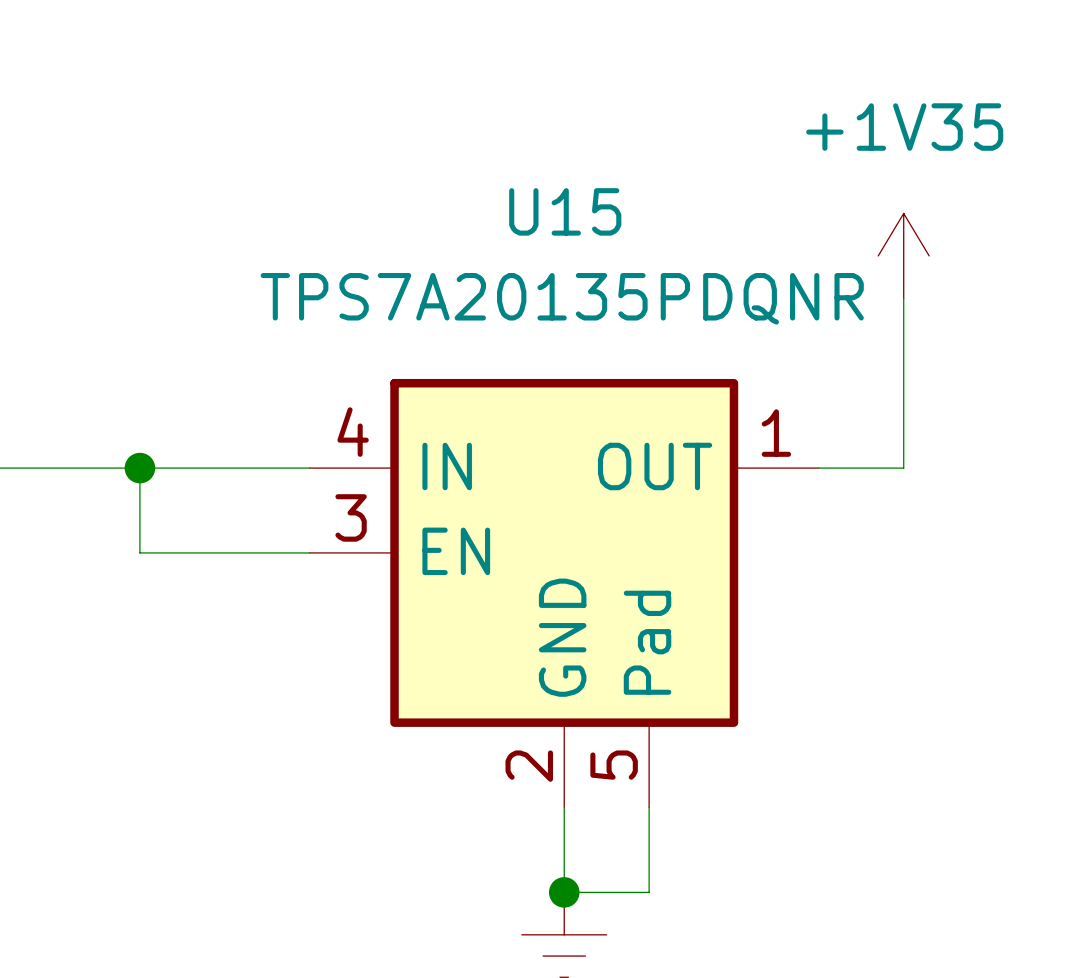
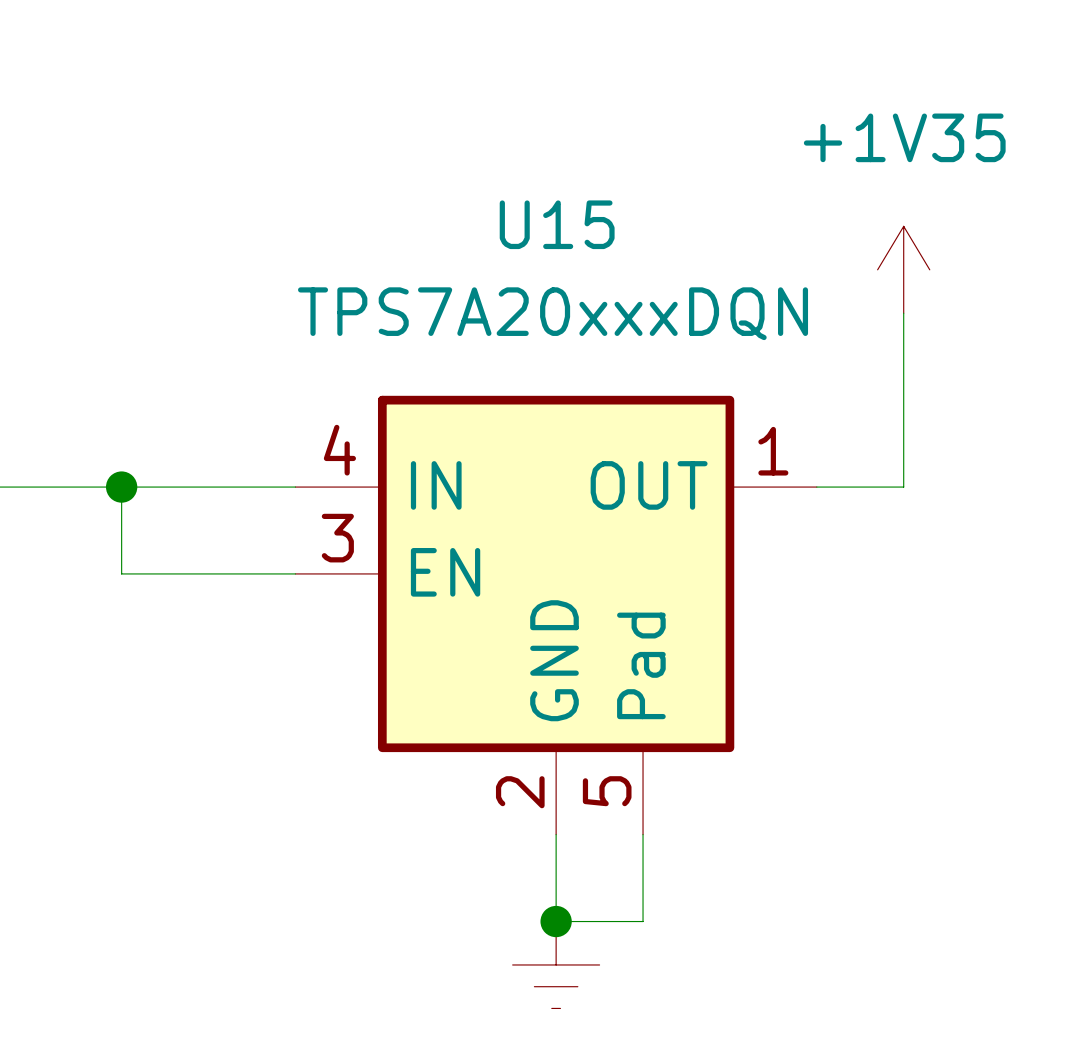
U15 value: TPS7A20135PDQNR (562, 298) -> TPS7A20xxxDQN (553, 313)

